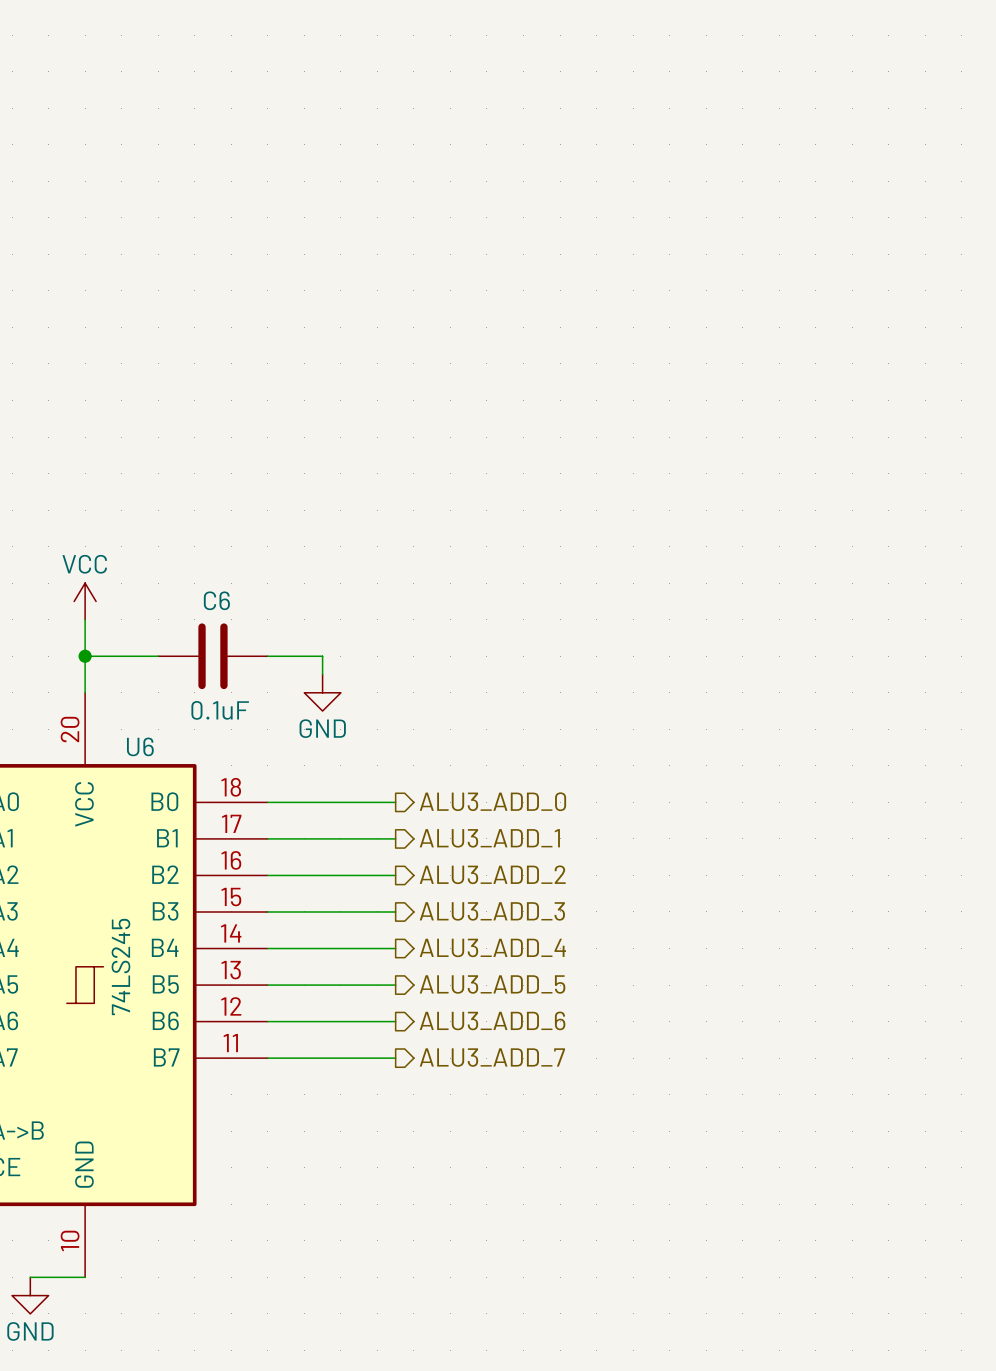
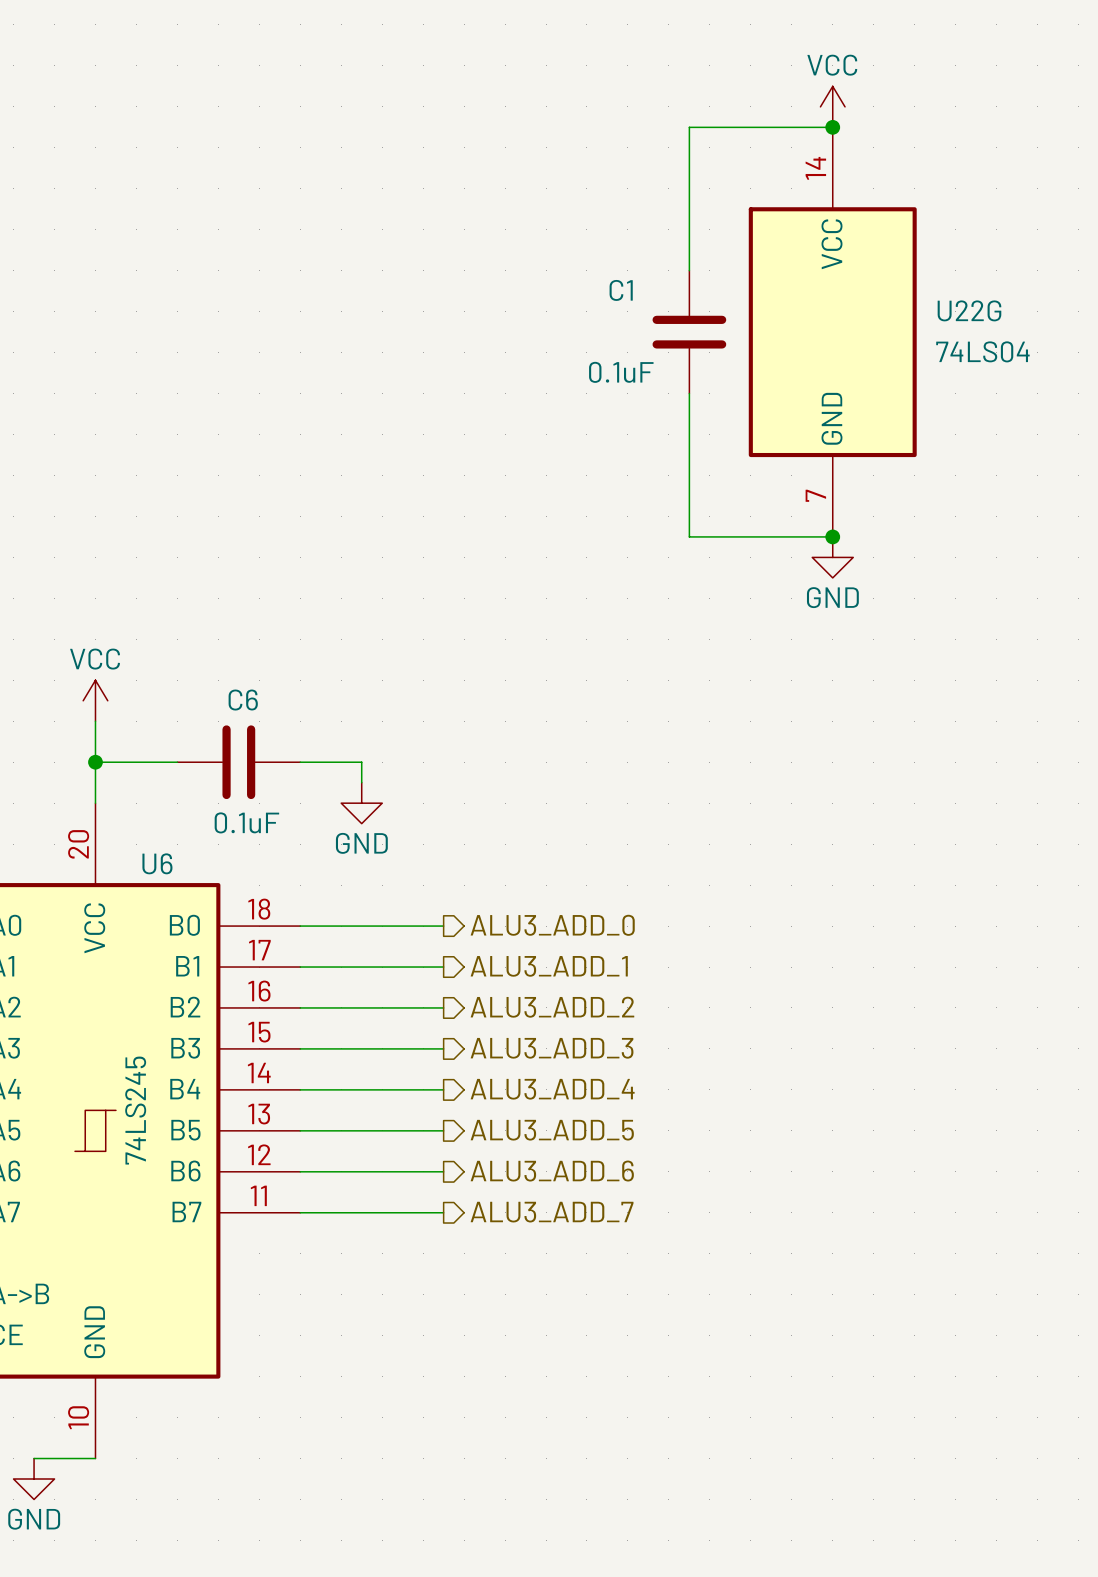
power symbol: none -> VCC (832, 106)
wire: none -> (832, 127) (689, 127) (689, 270)
junction: none -> (832, 127)
C1: none -> 0.1uF (689, 332)
U22G: none -> 74LS04 (832, 332)
wire: none -> (689, 393) (689, 536) (832, 536)
junction: none -> (832, 536)
power symbol: none -> GND (832, 557)

